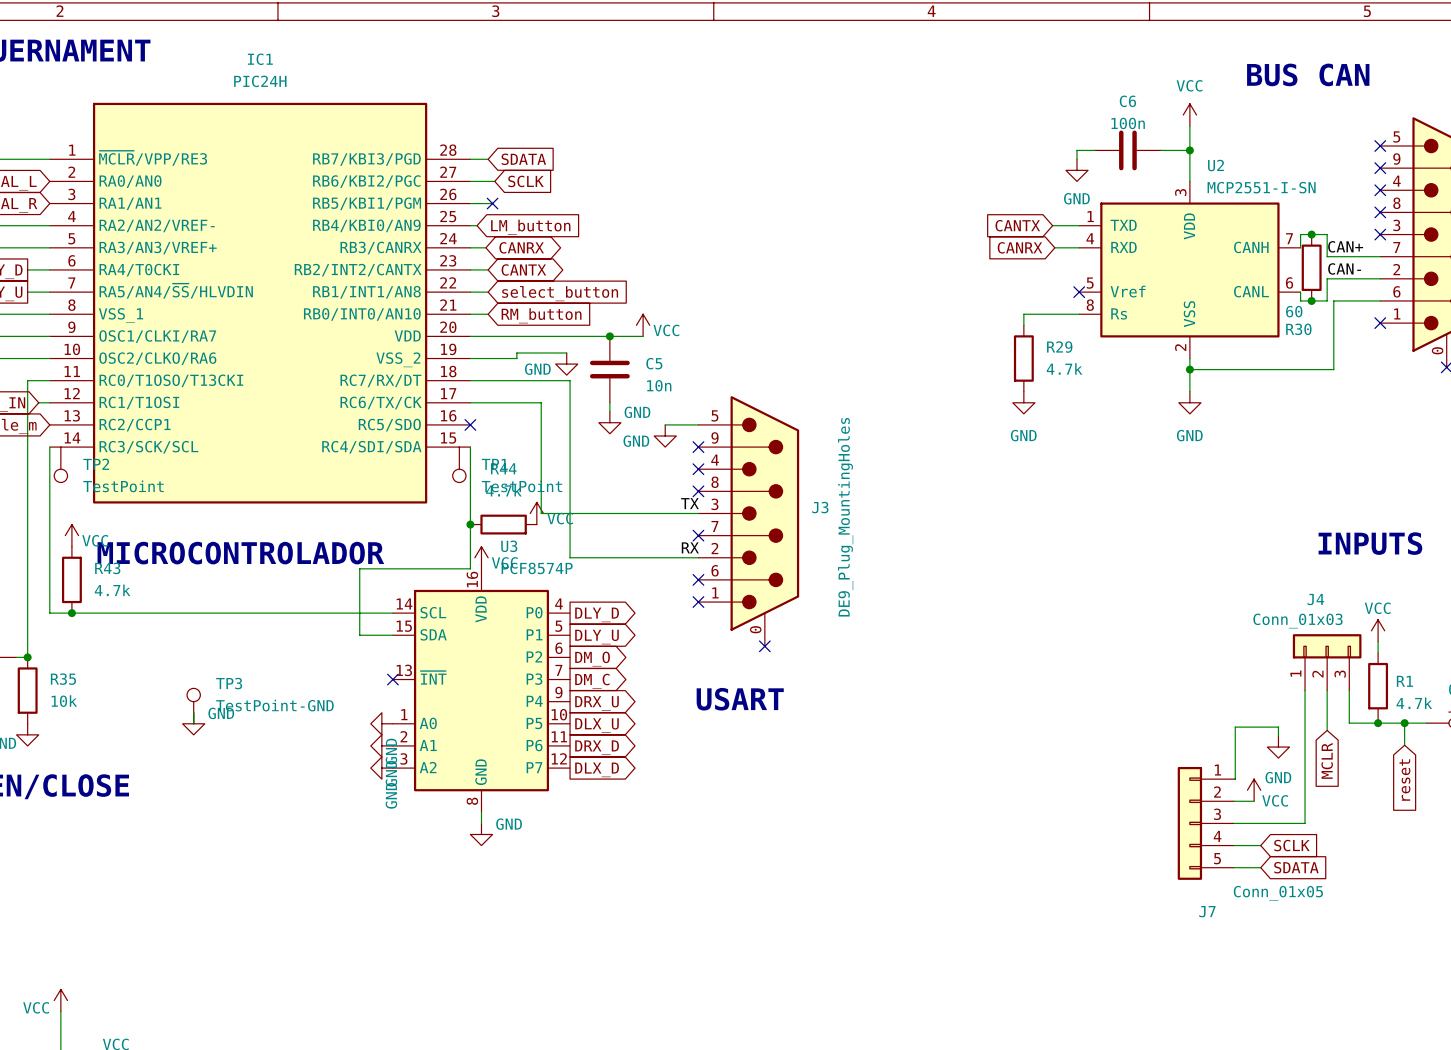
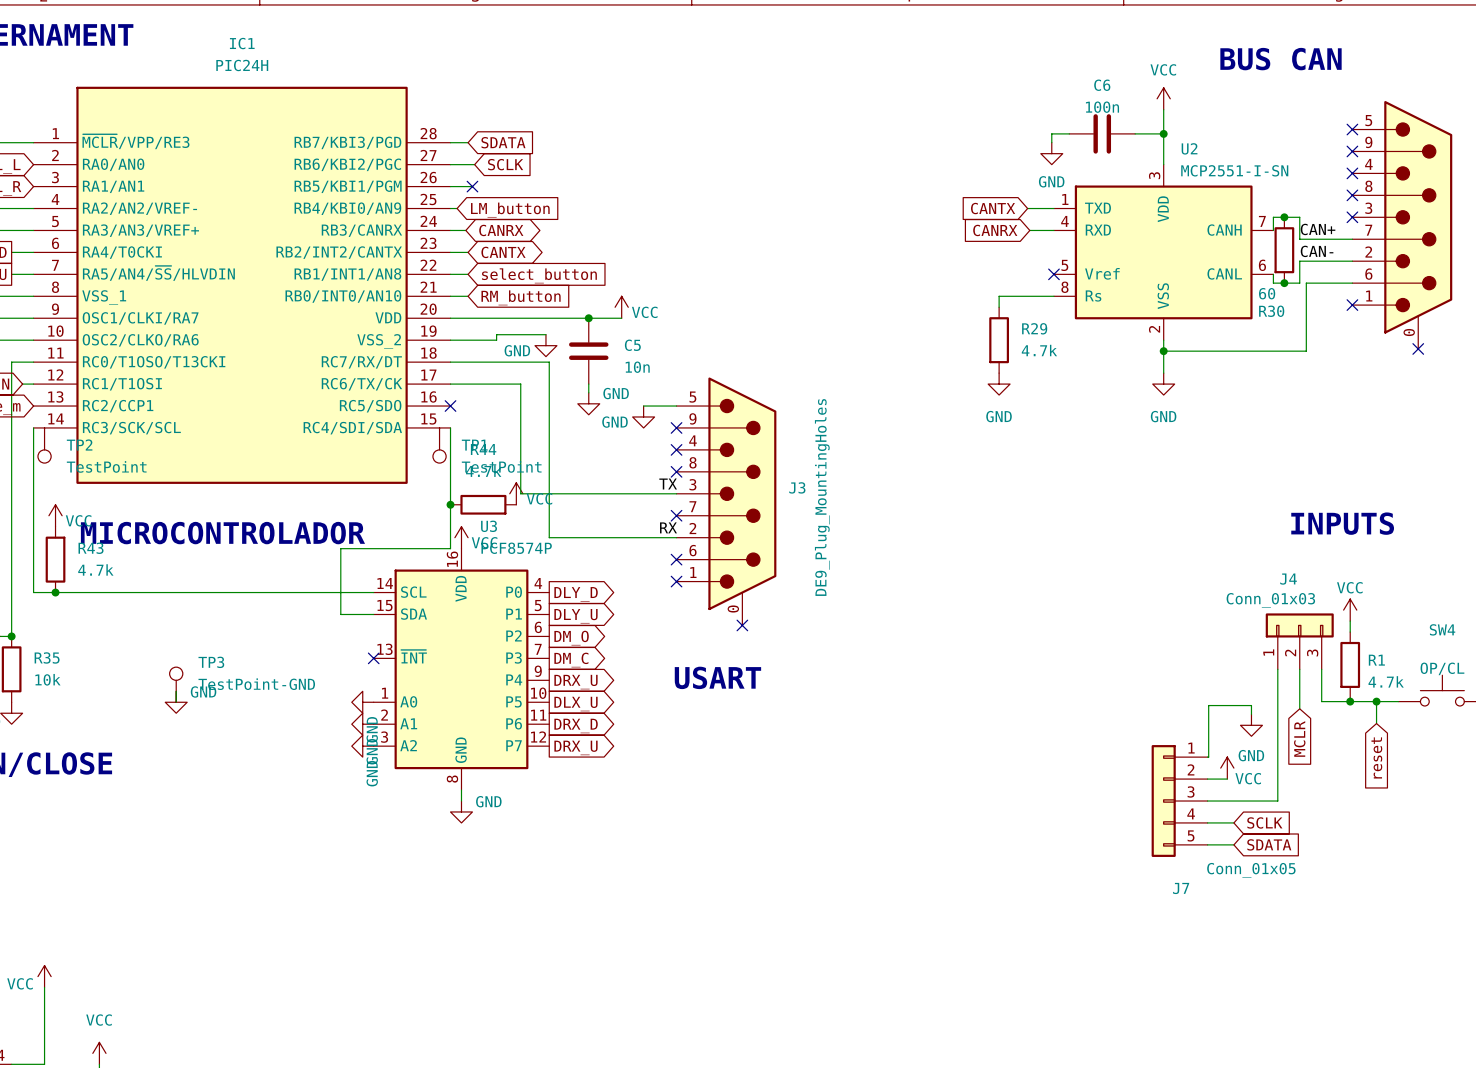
global label: DLX_D (597, 769) -> DRX_U (575, 747)

